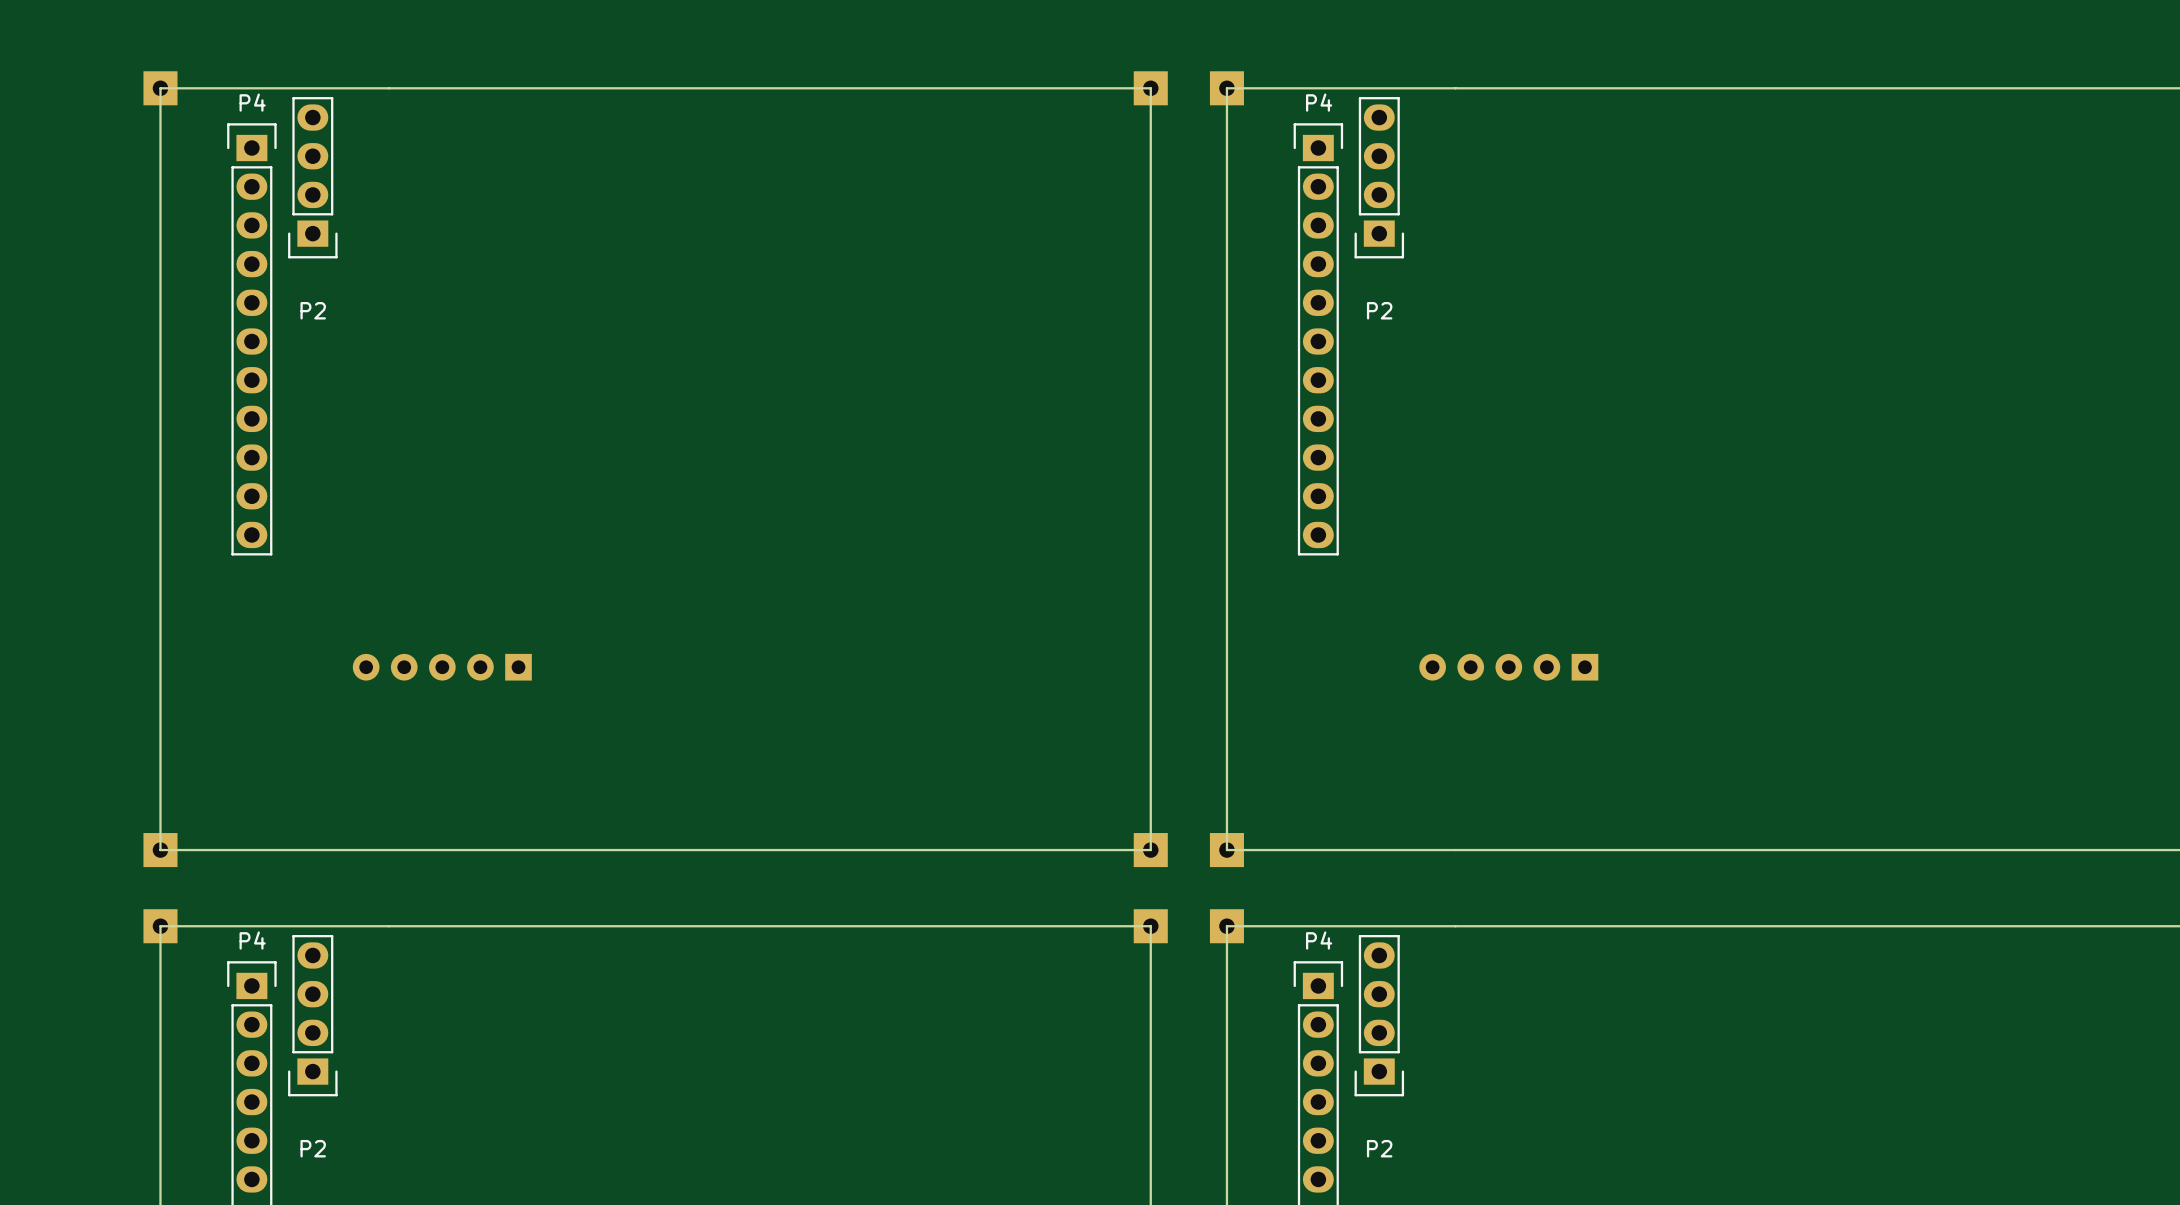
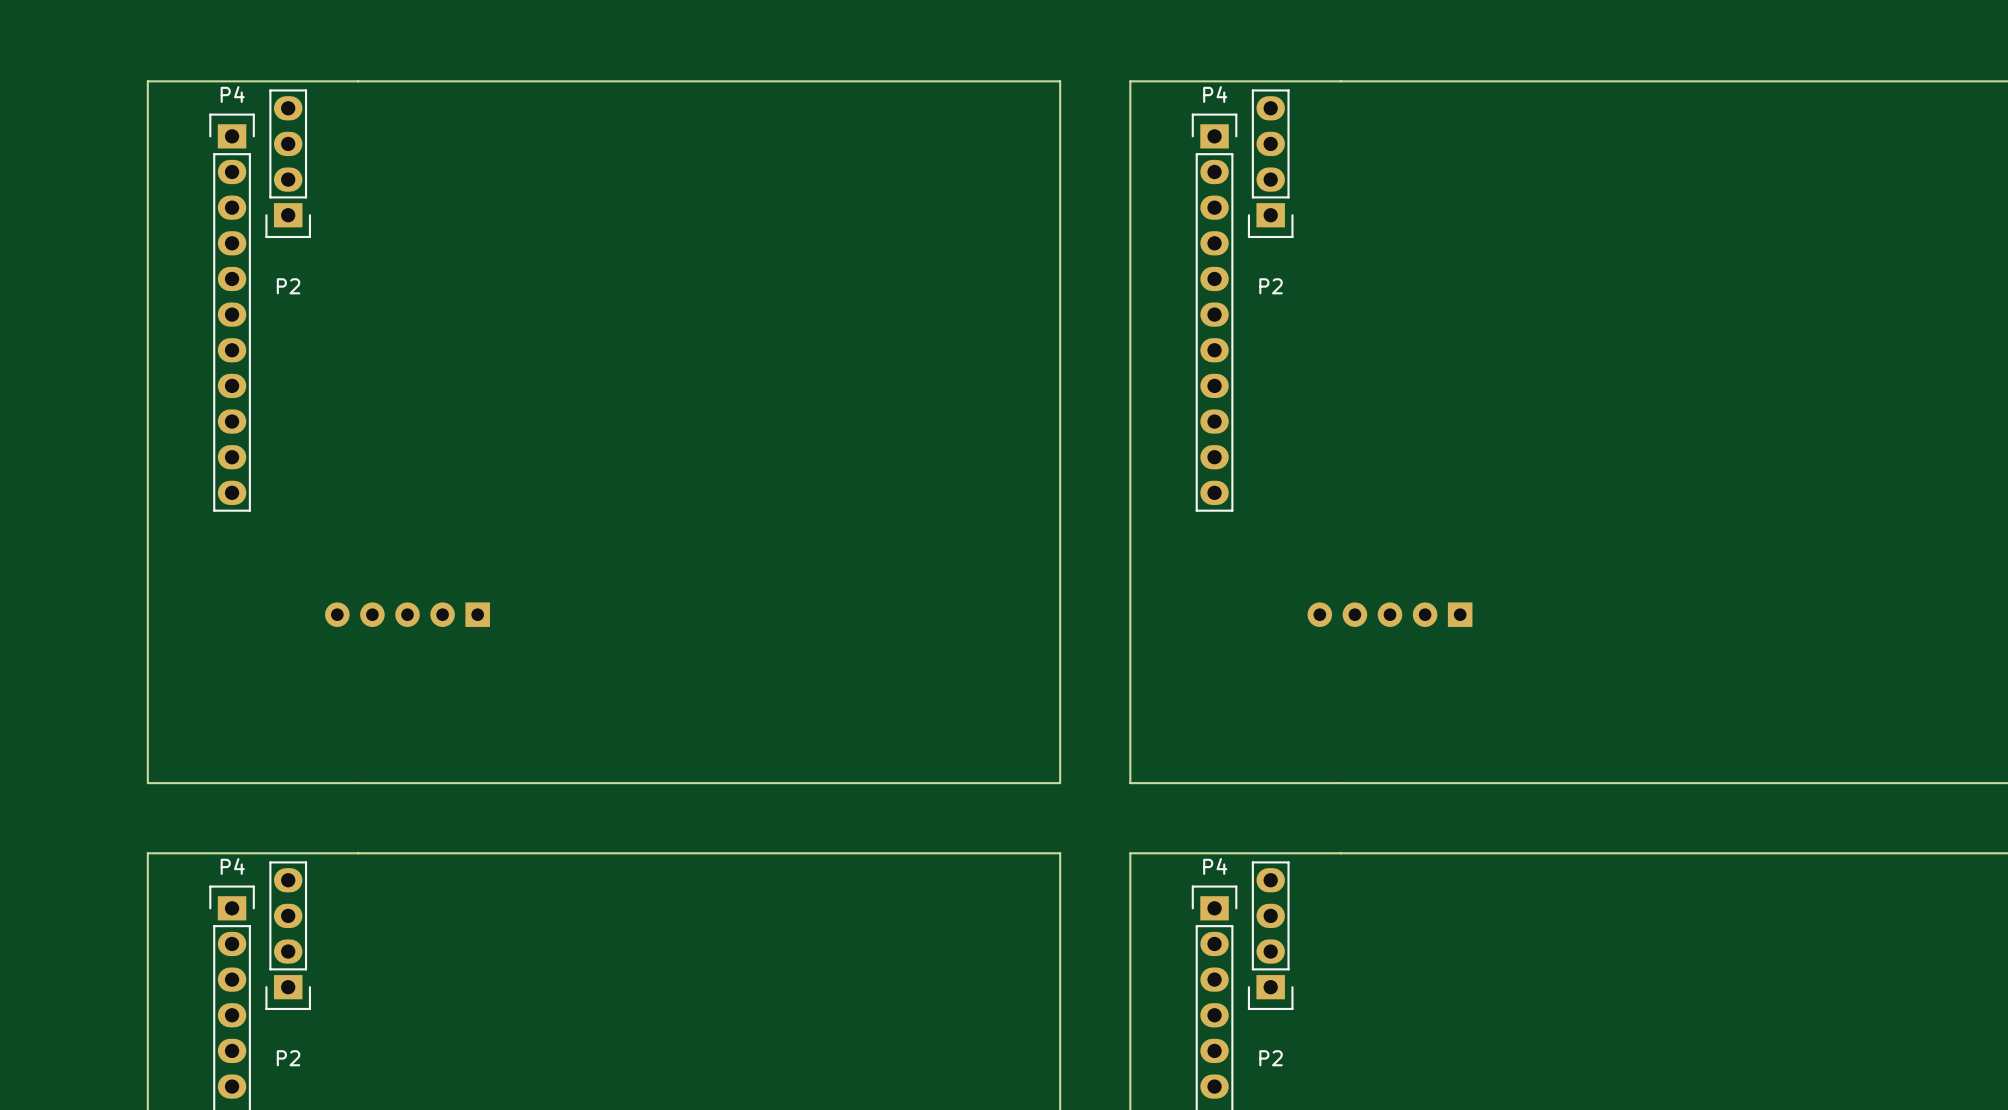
part: (160, 88) -> none
part: (1150, 88) -> none
part: (1226, 88) -> none
part: (160, 850) -> none
part: (1150, 850) -> none
part: (1226, 850) -> none
part: (160, 926) -> none
part: (1150, 926) -> none
part: (1226, 926) -> none

